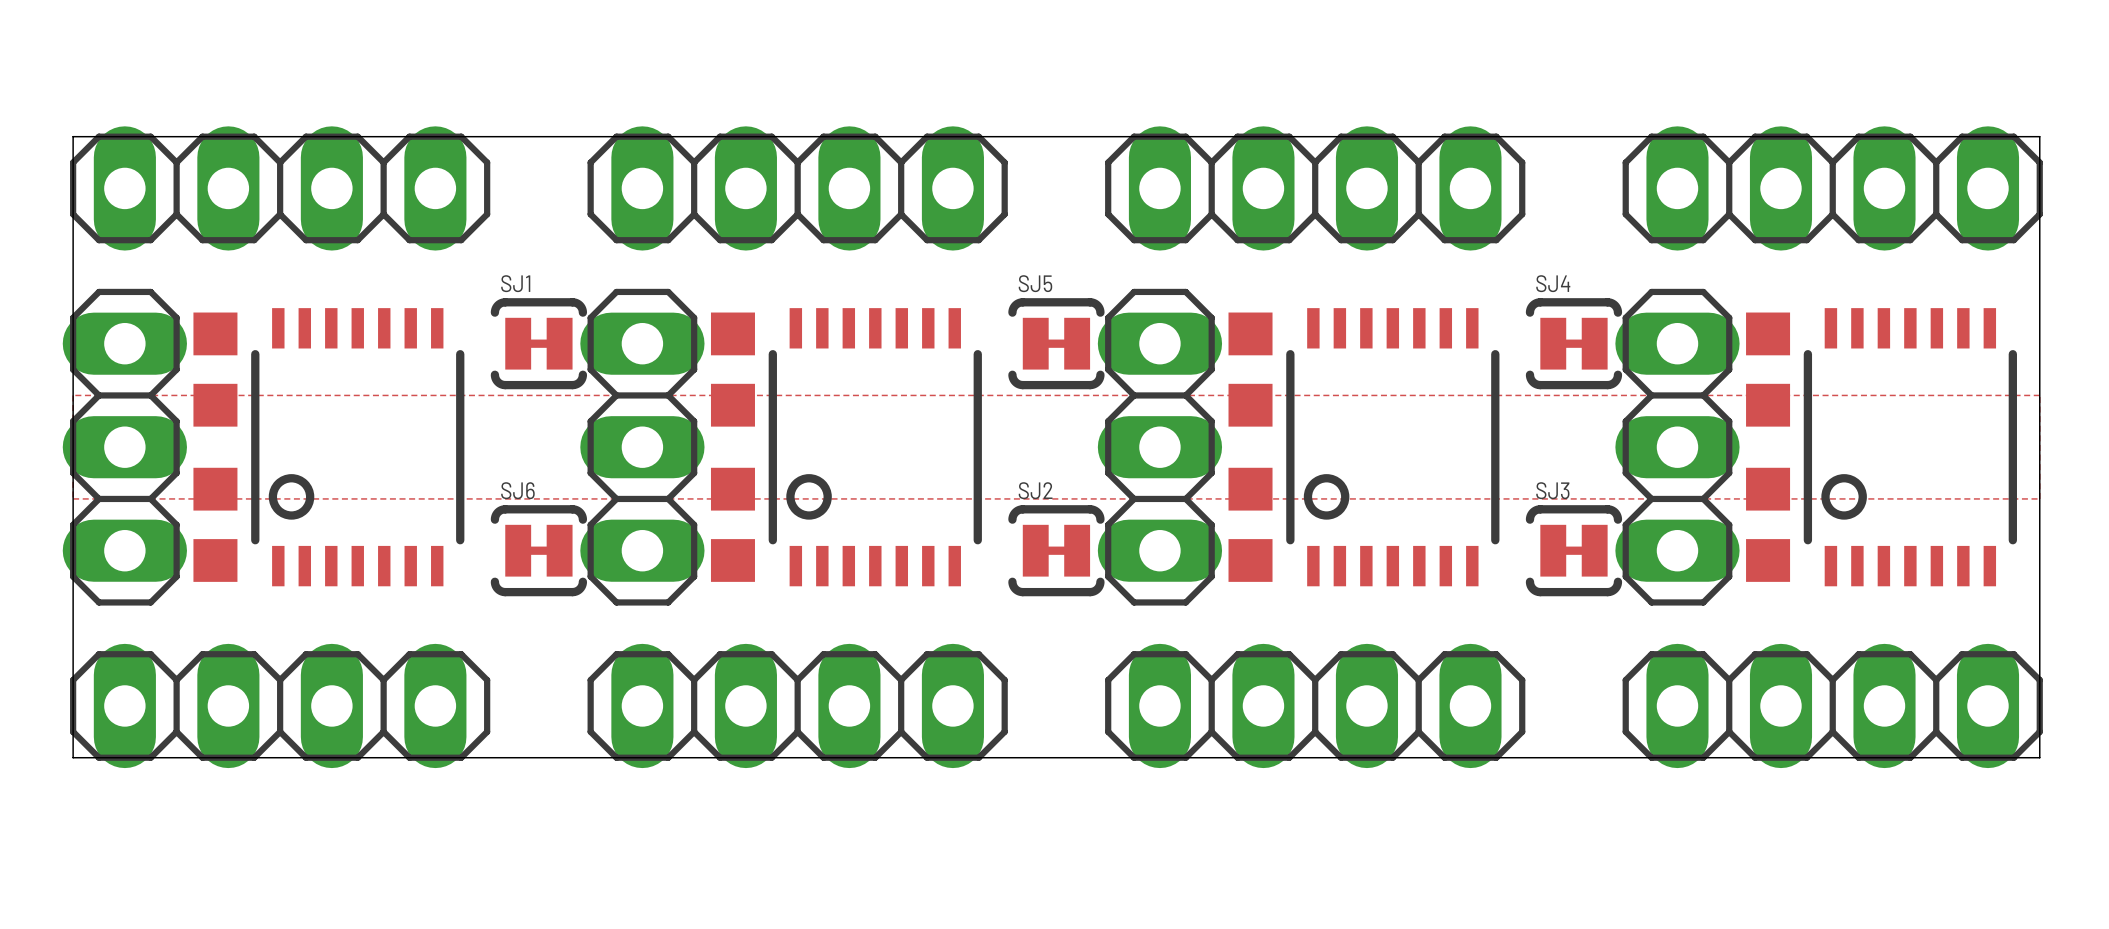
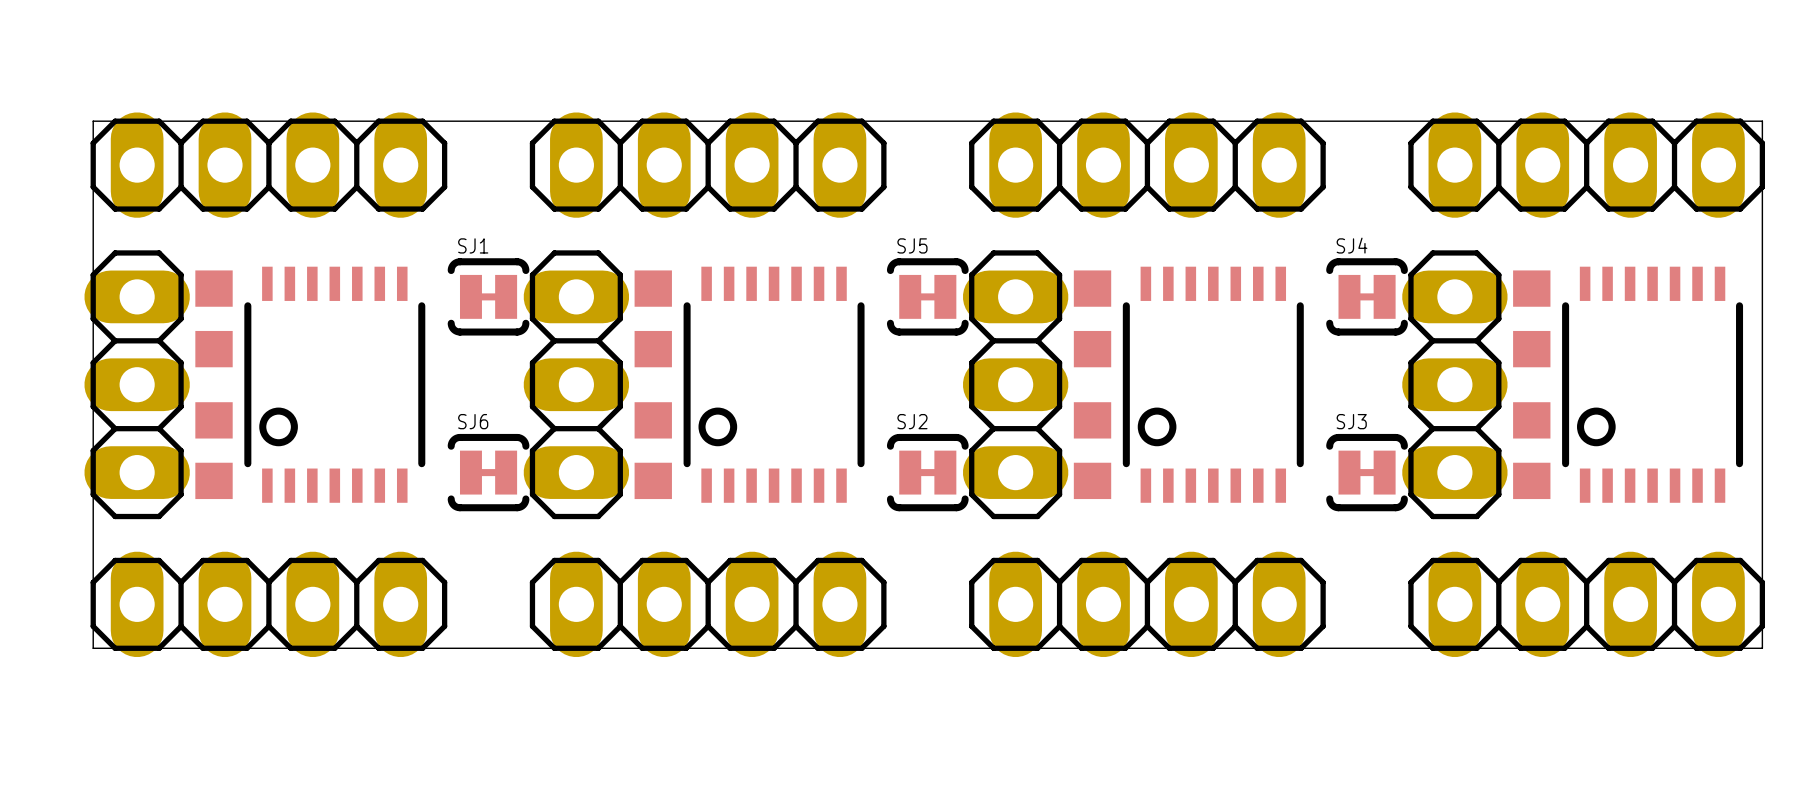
top zone outline: (73, 395) (73, 498) (2039, 498) (2039, 395) (73, 395) -> none

